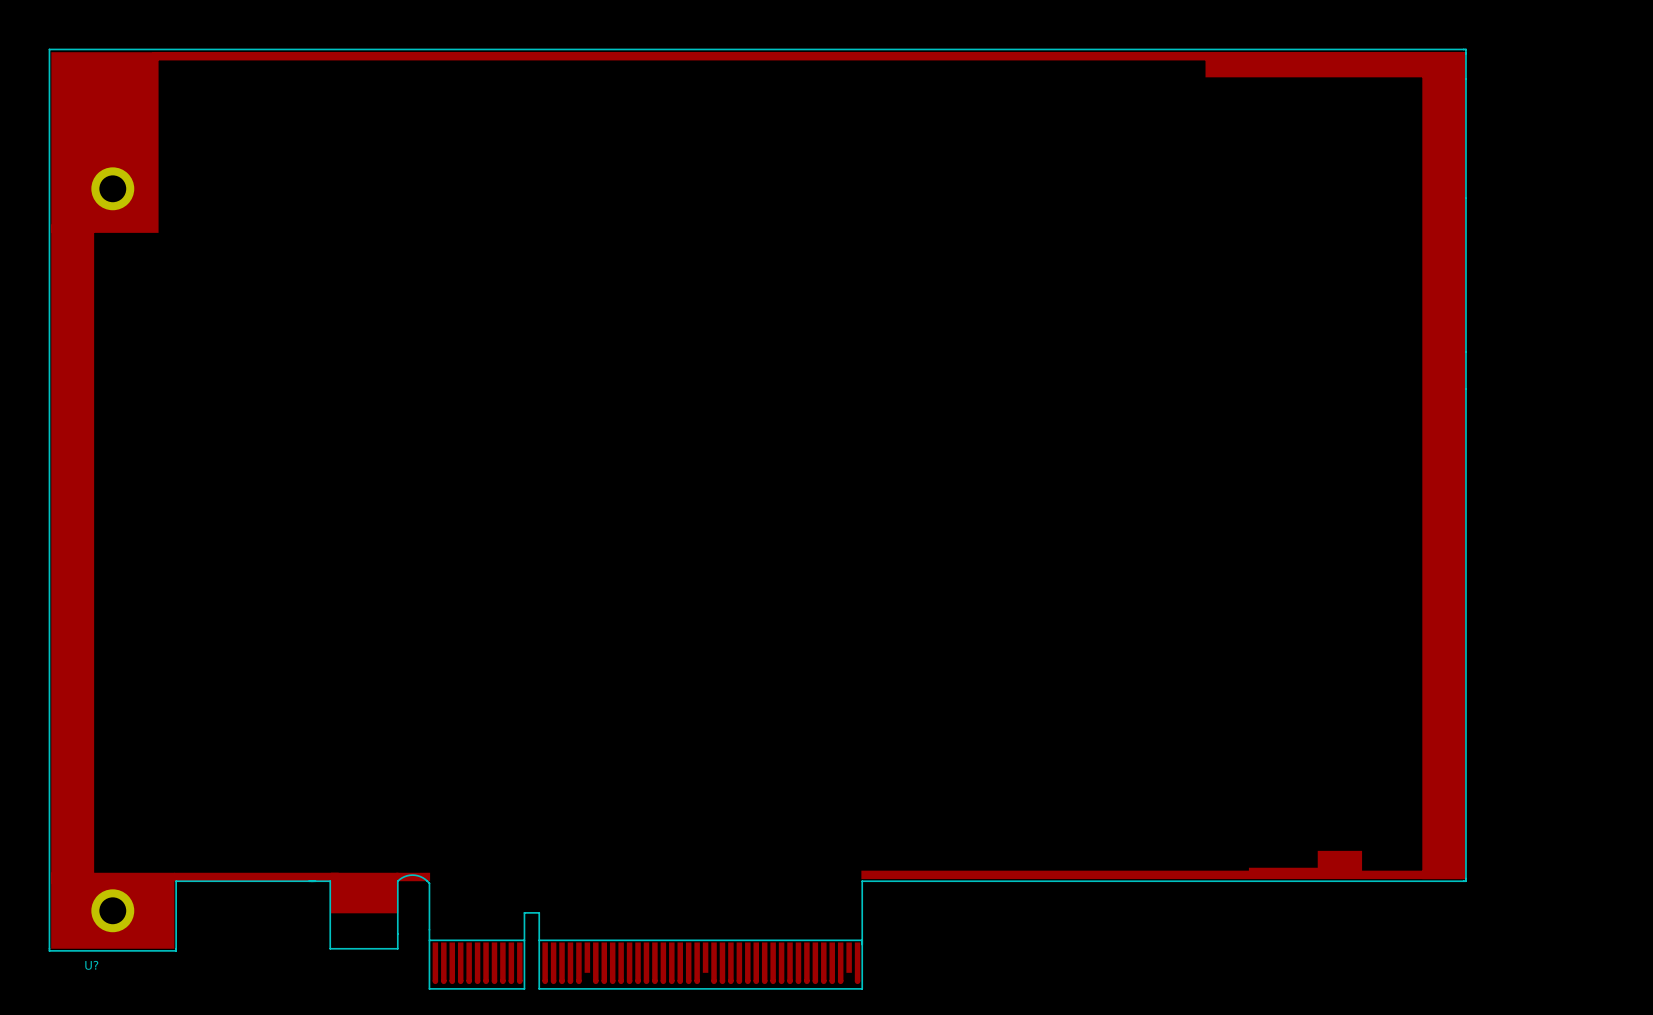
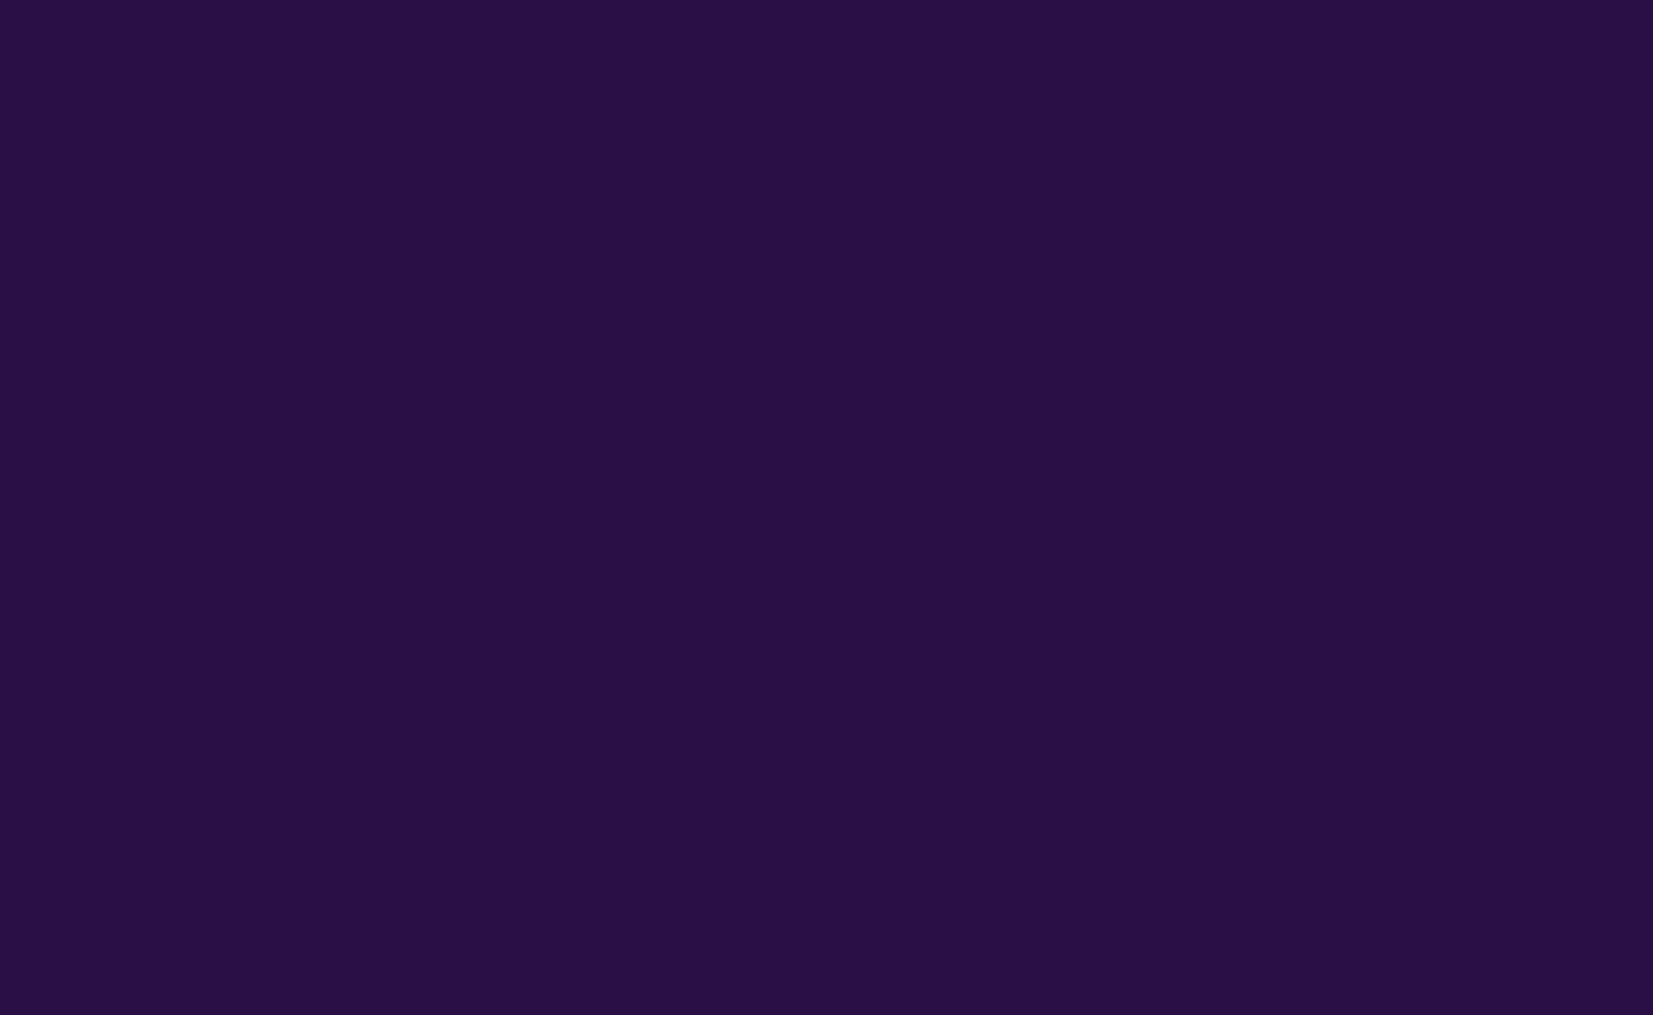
U?: (757, 519) -> none

